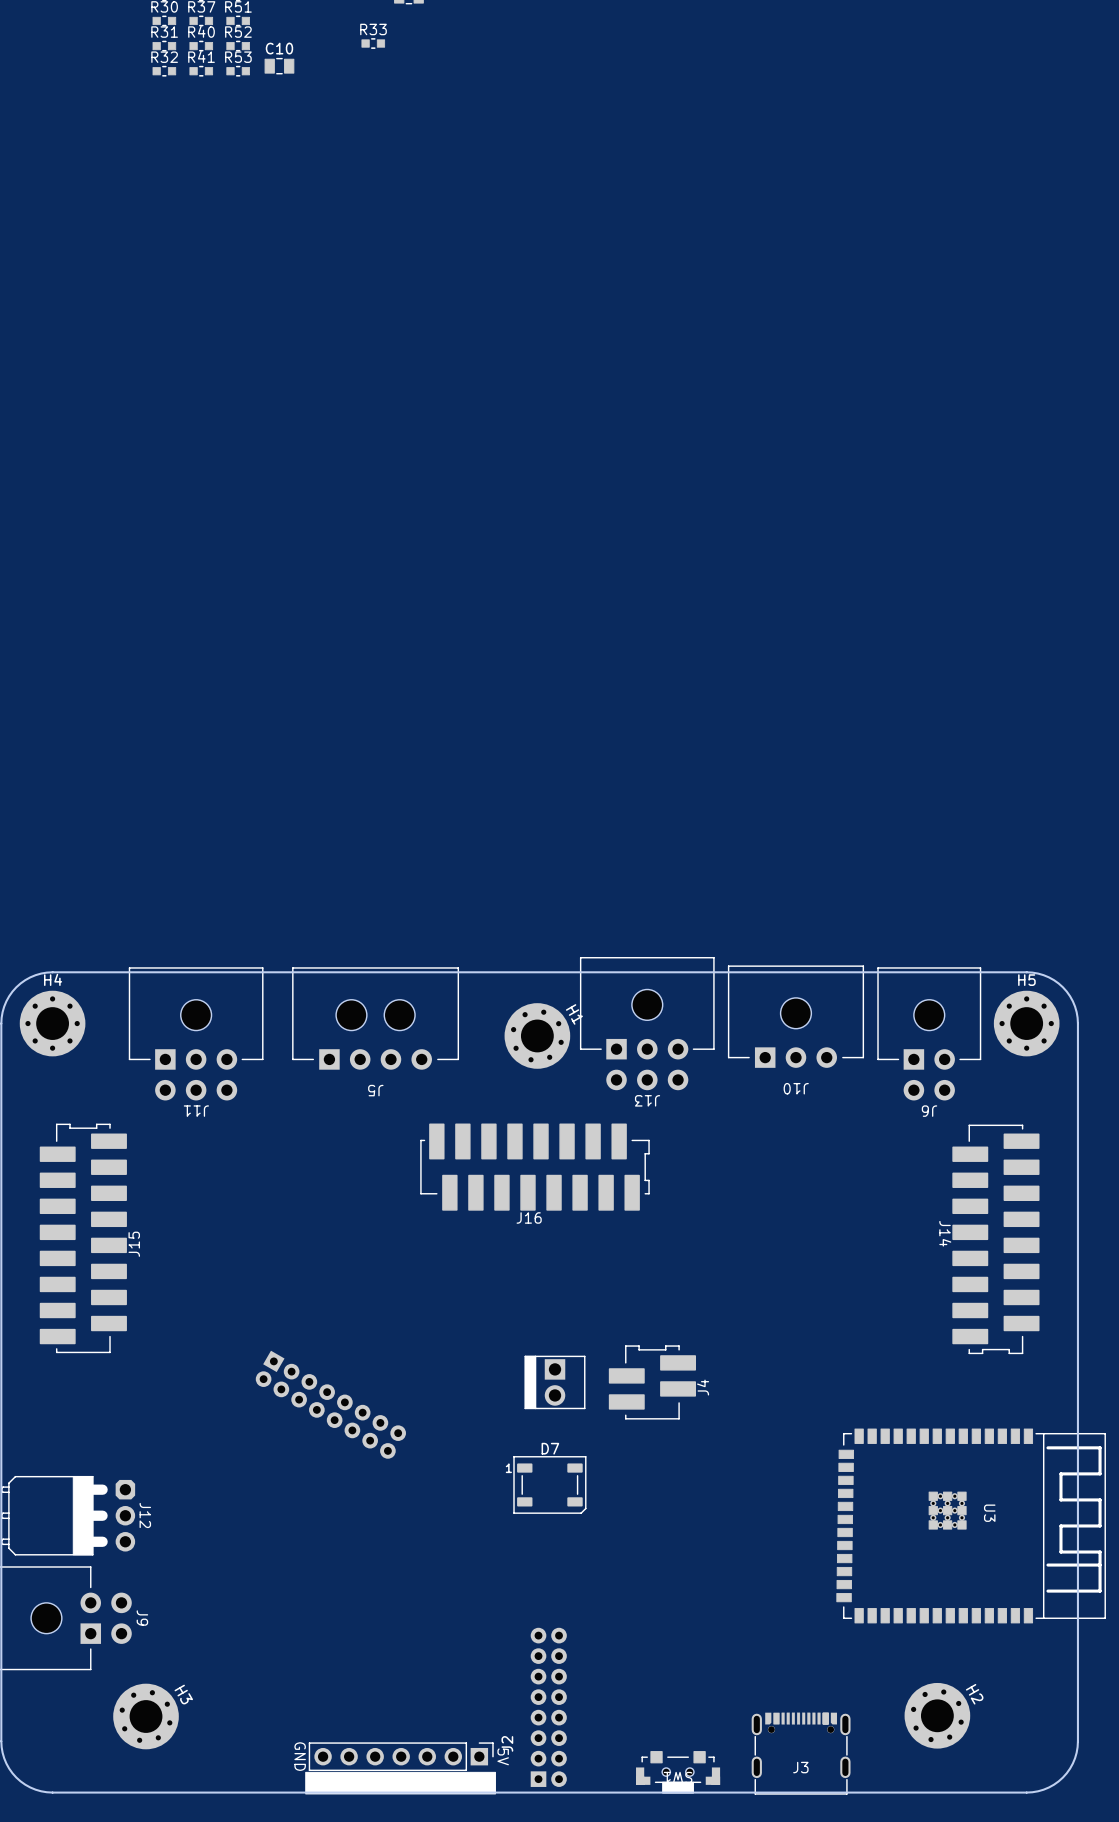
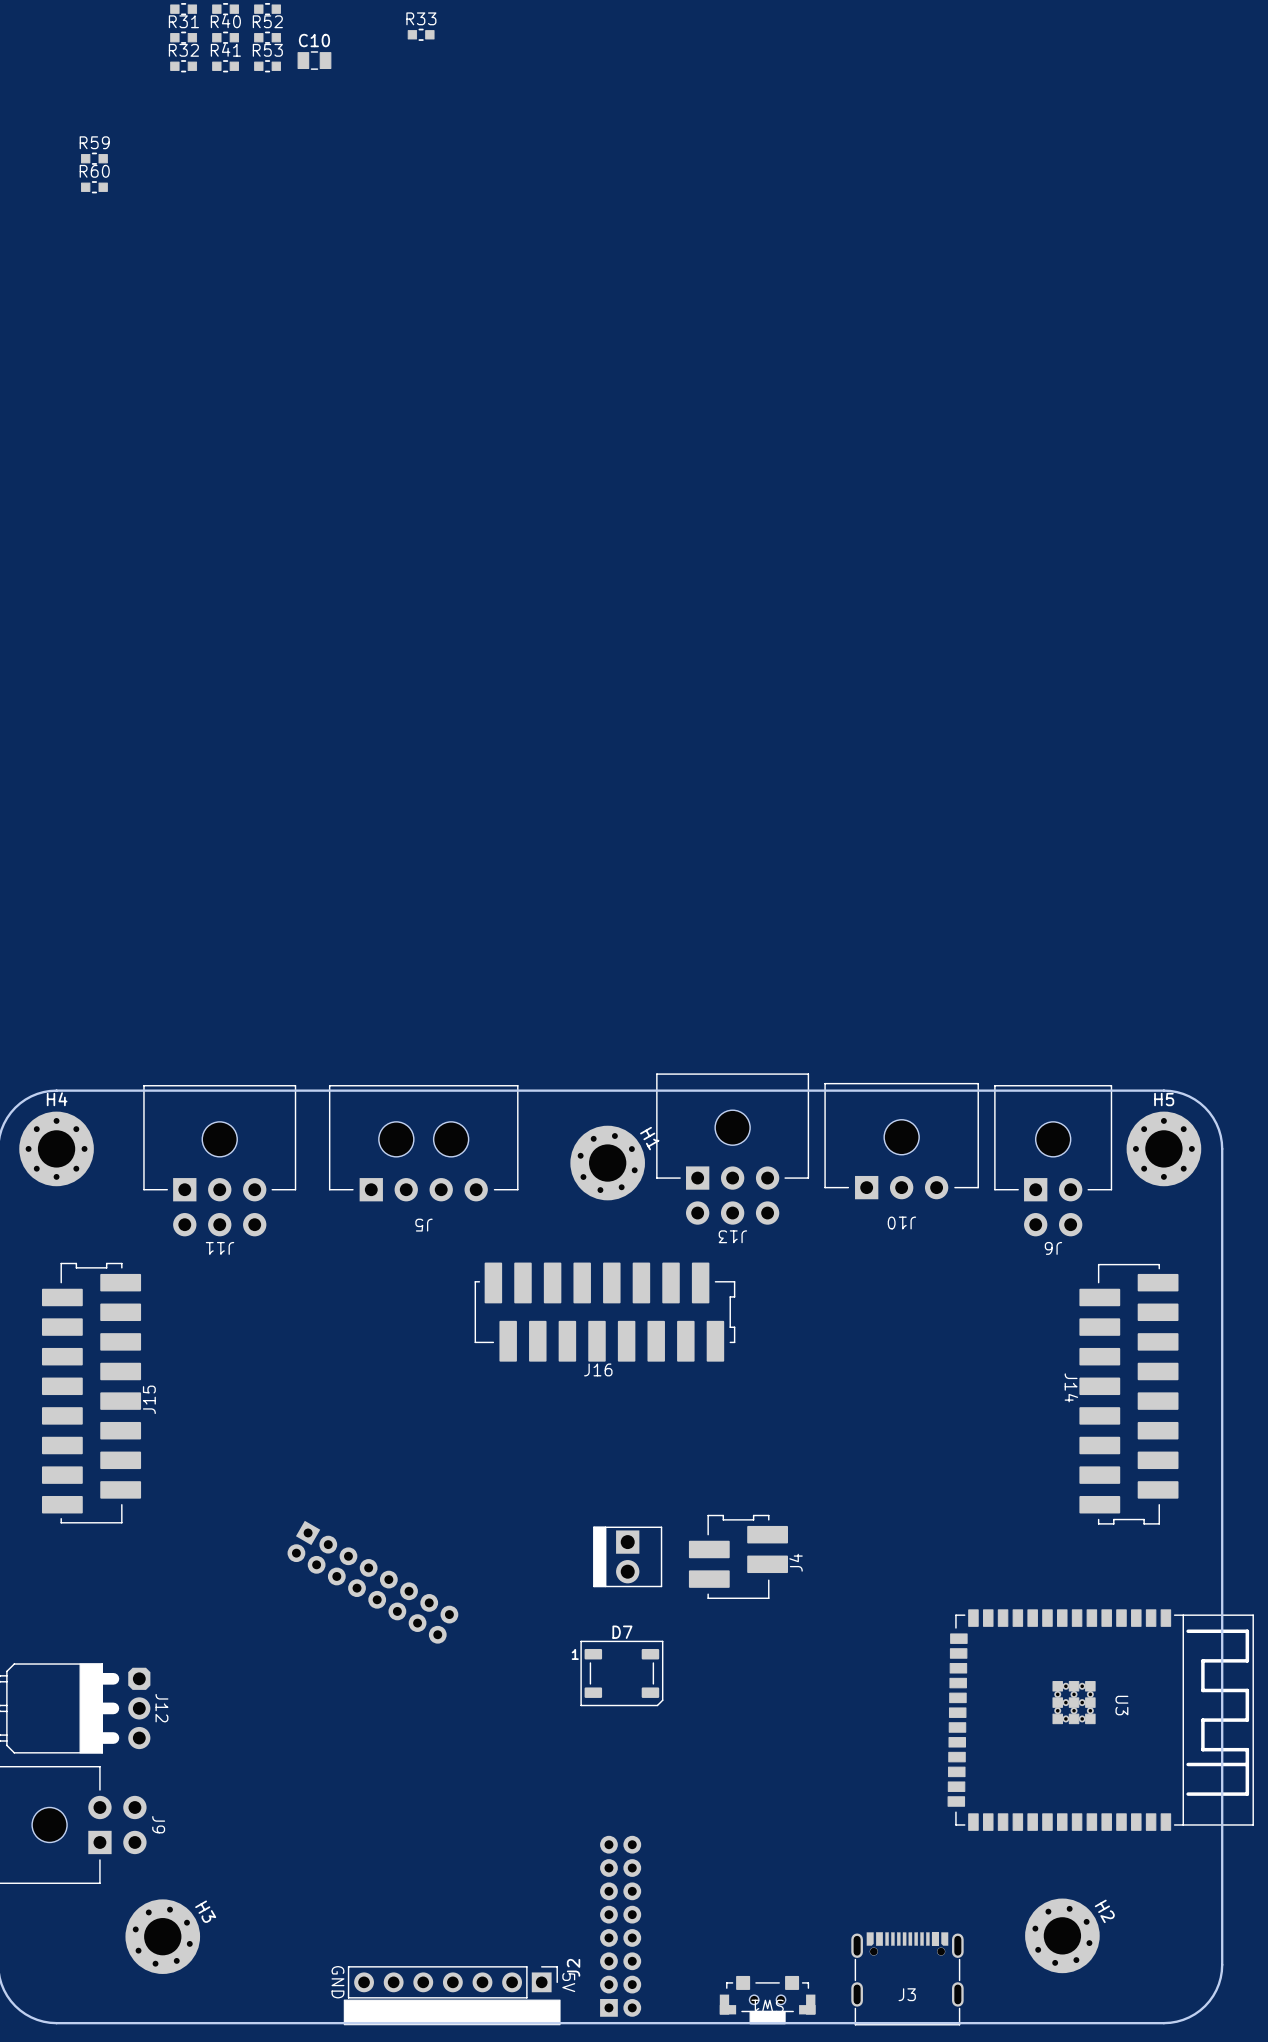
R59: none -> (94, 158)
R60: none -> (94, 187)

